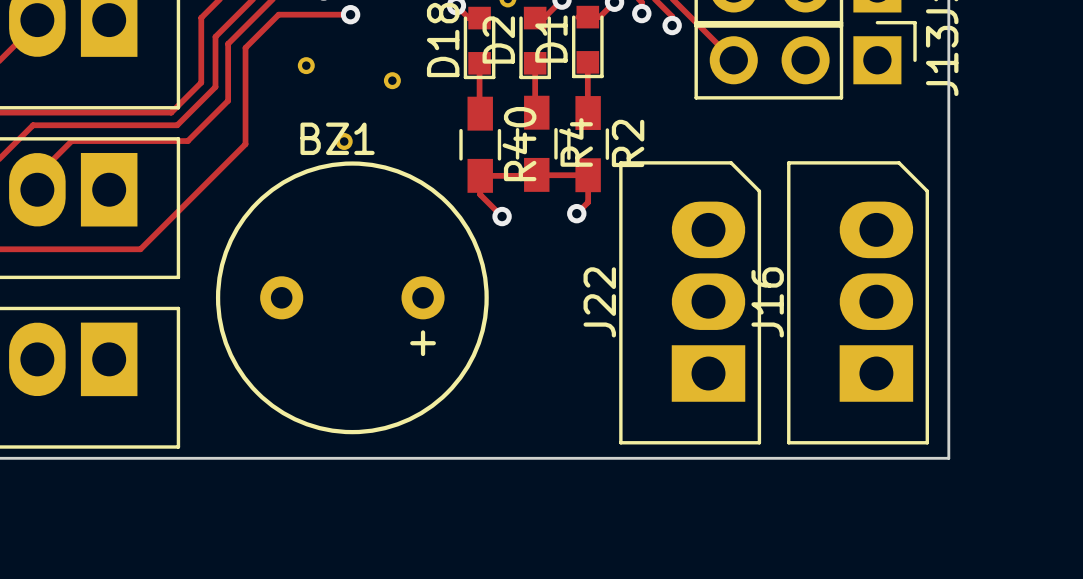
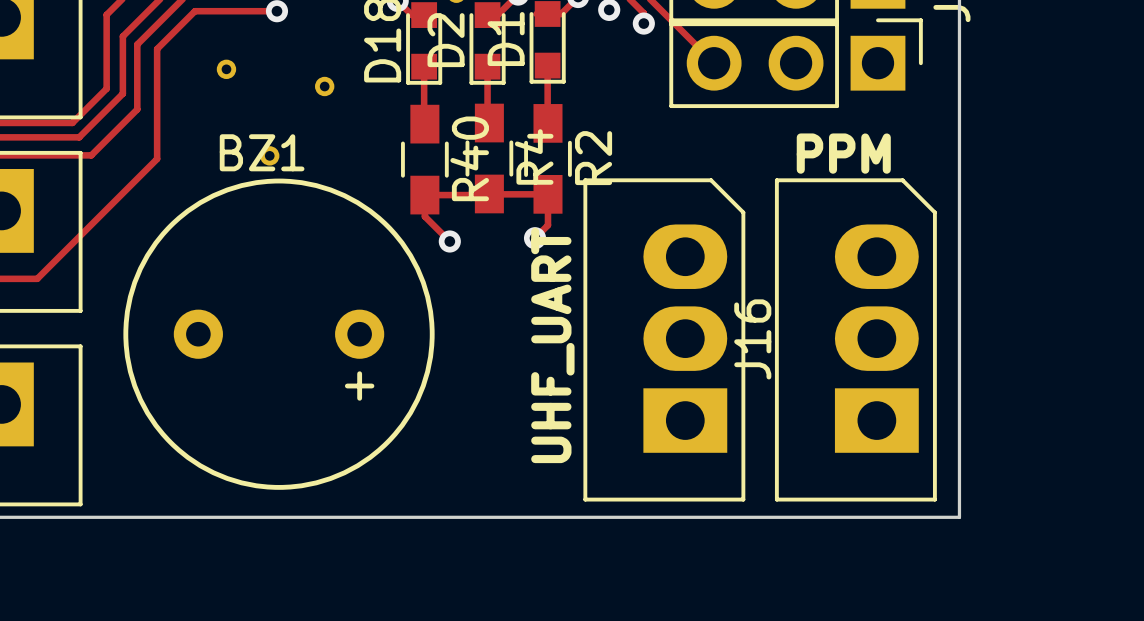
J13 name: J13 (942, 60) -> none
text: none -> PPM (843, 153)
J22 name: J22 (599, 302) -> none
text: none -> UHF_UART (552, 345)

